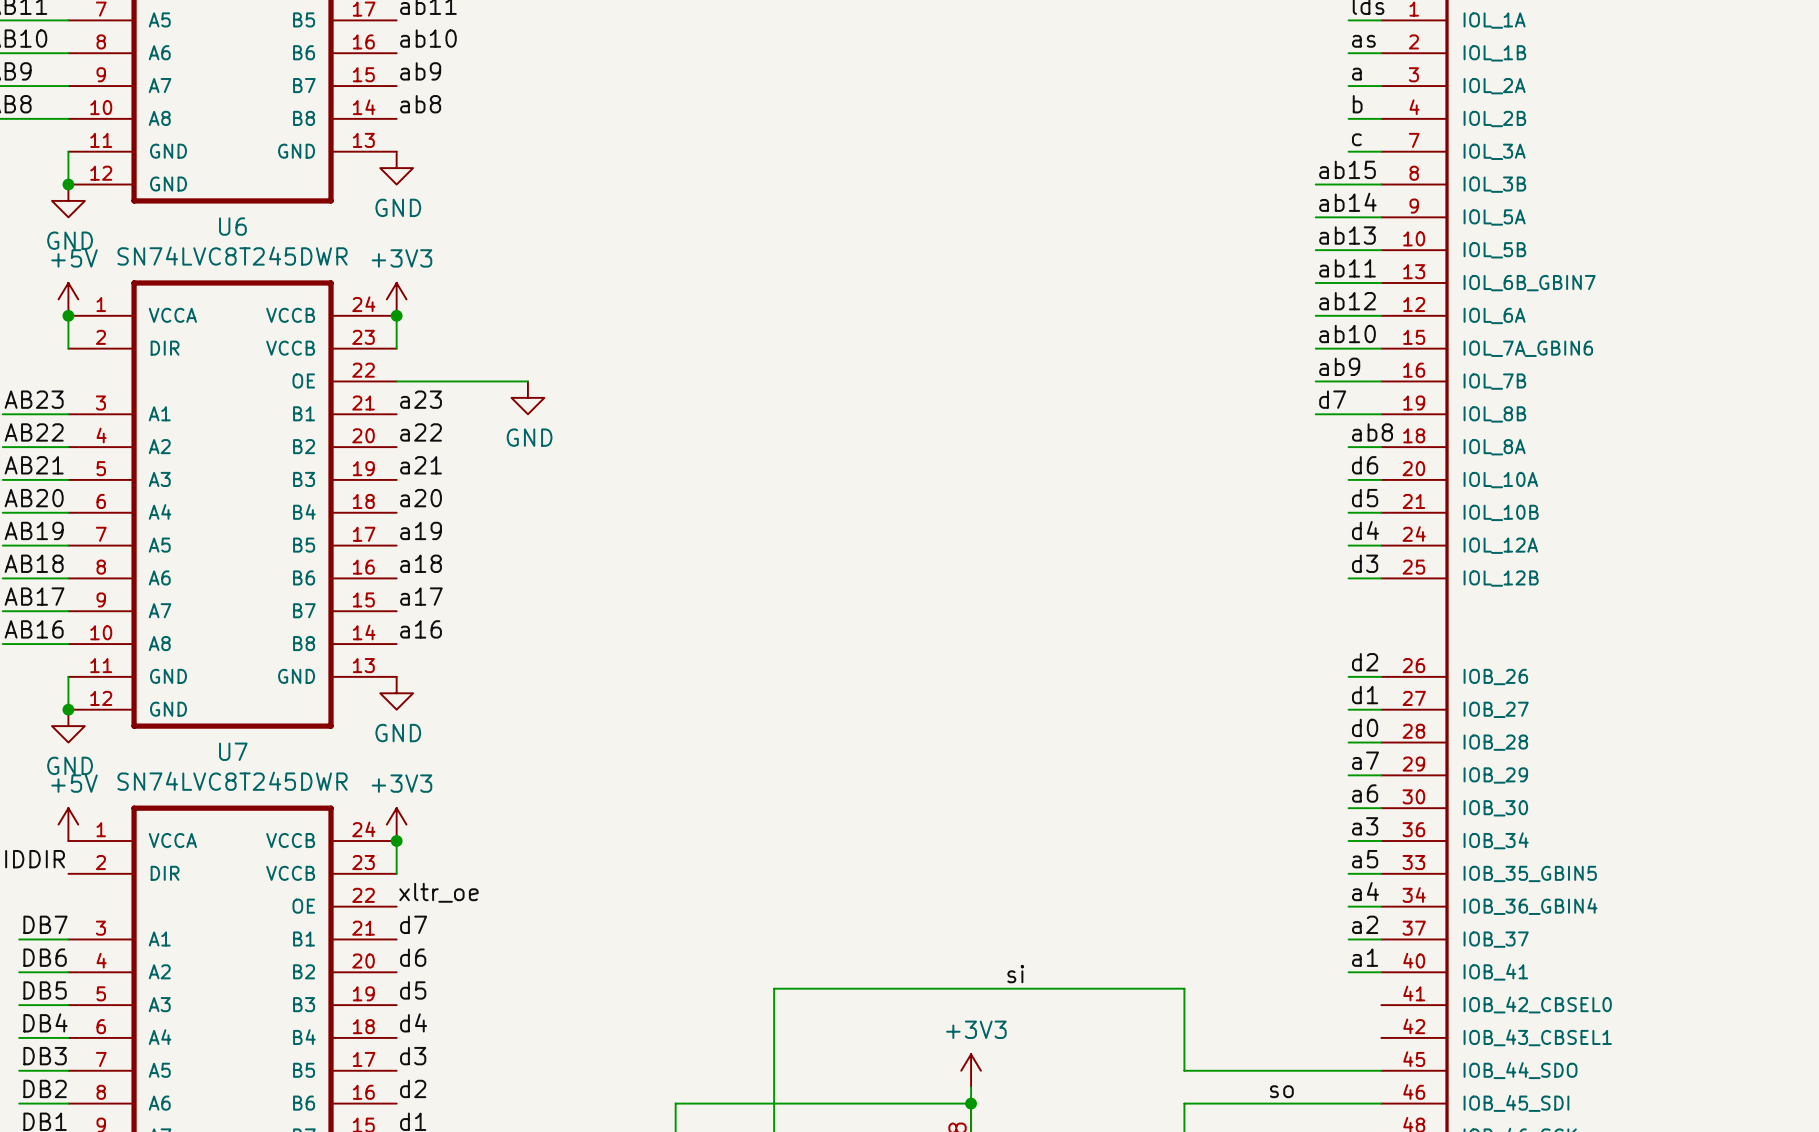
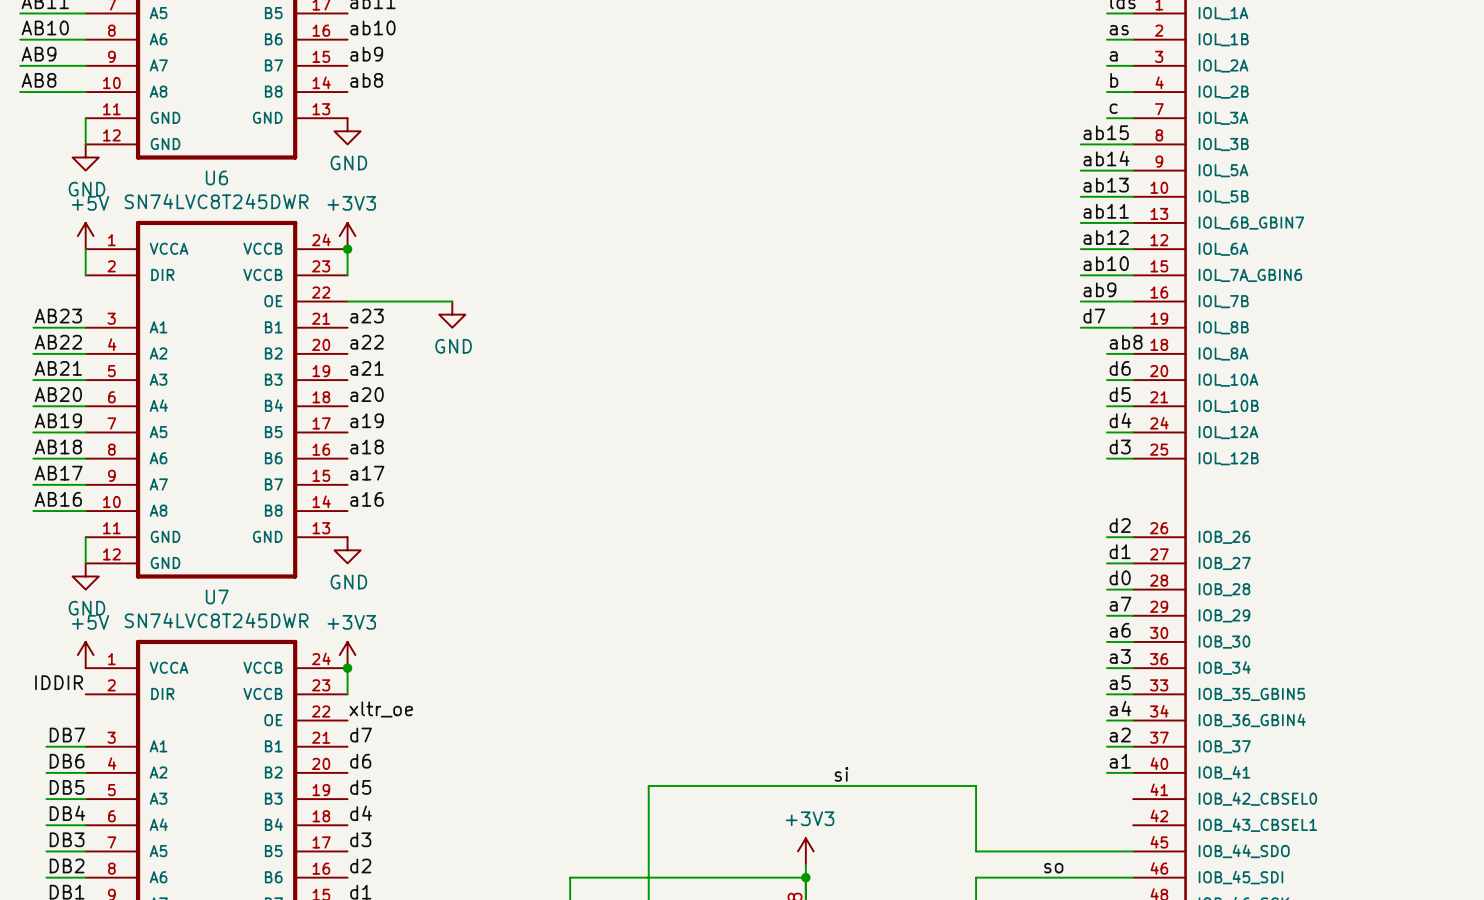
junction: (68, 184) -> none
junction: (68, 315) -> none
junction: (68, 709) -> none

